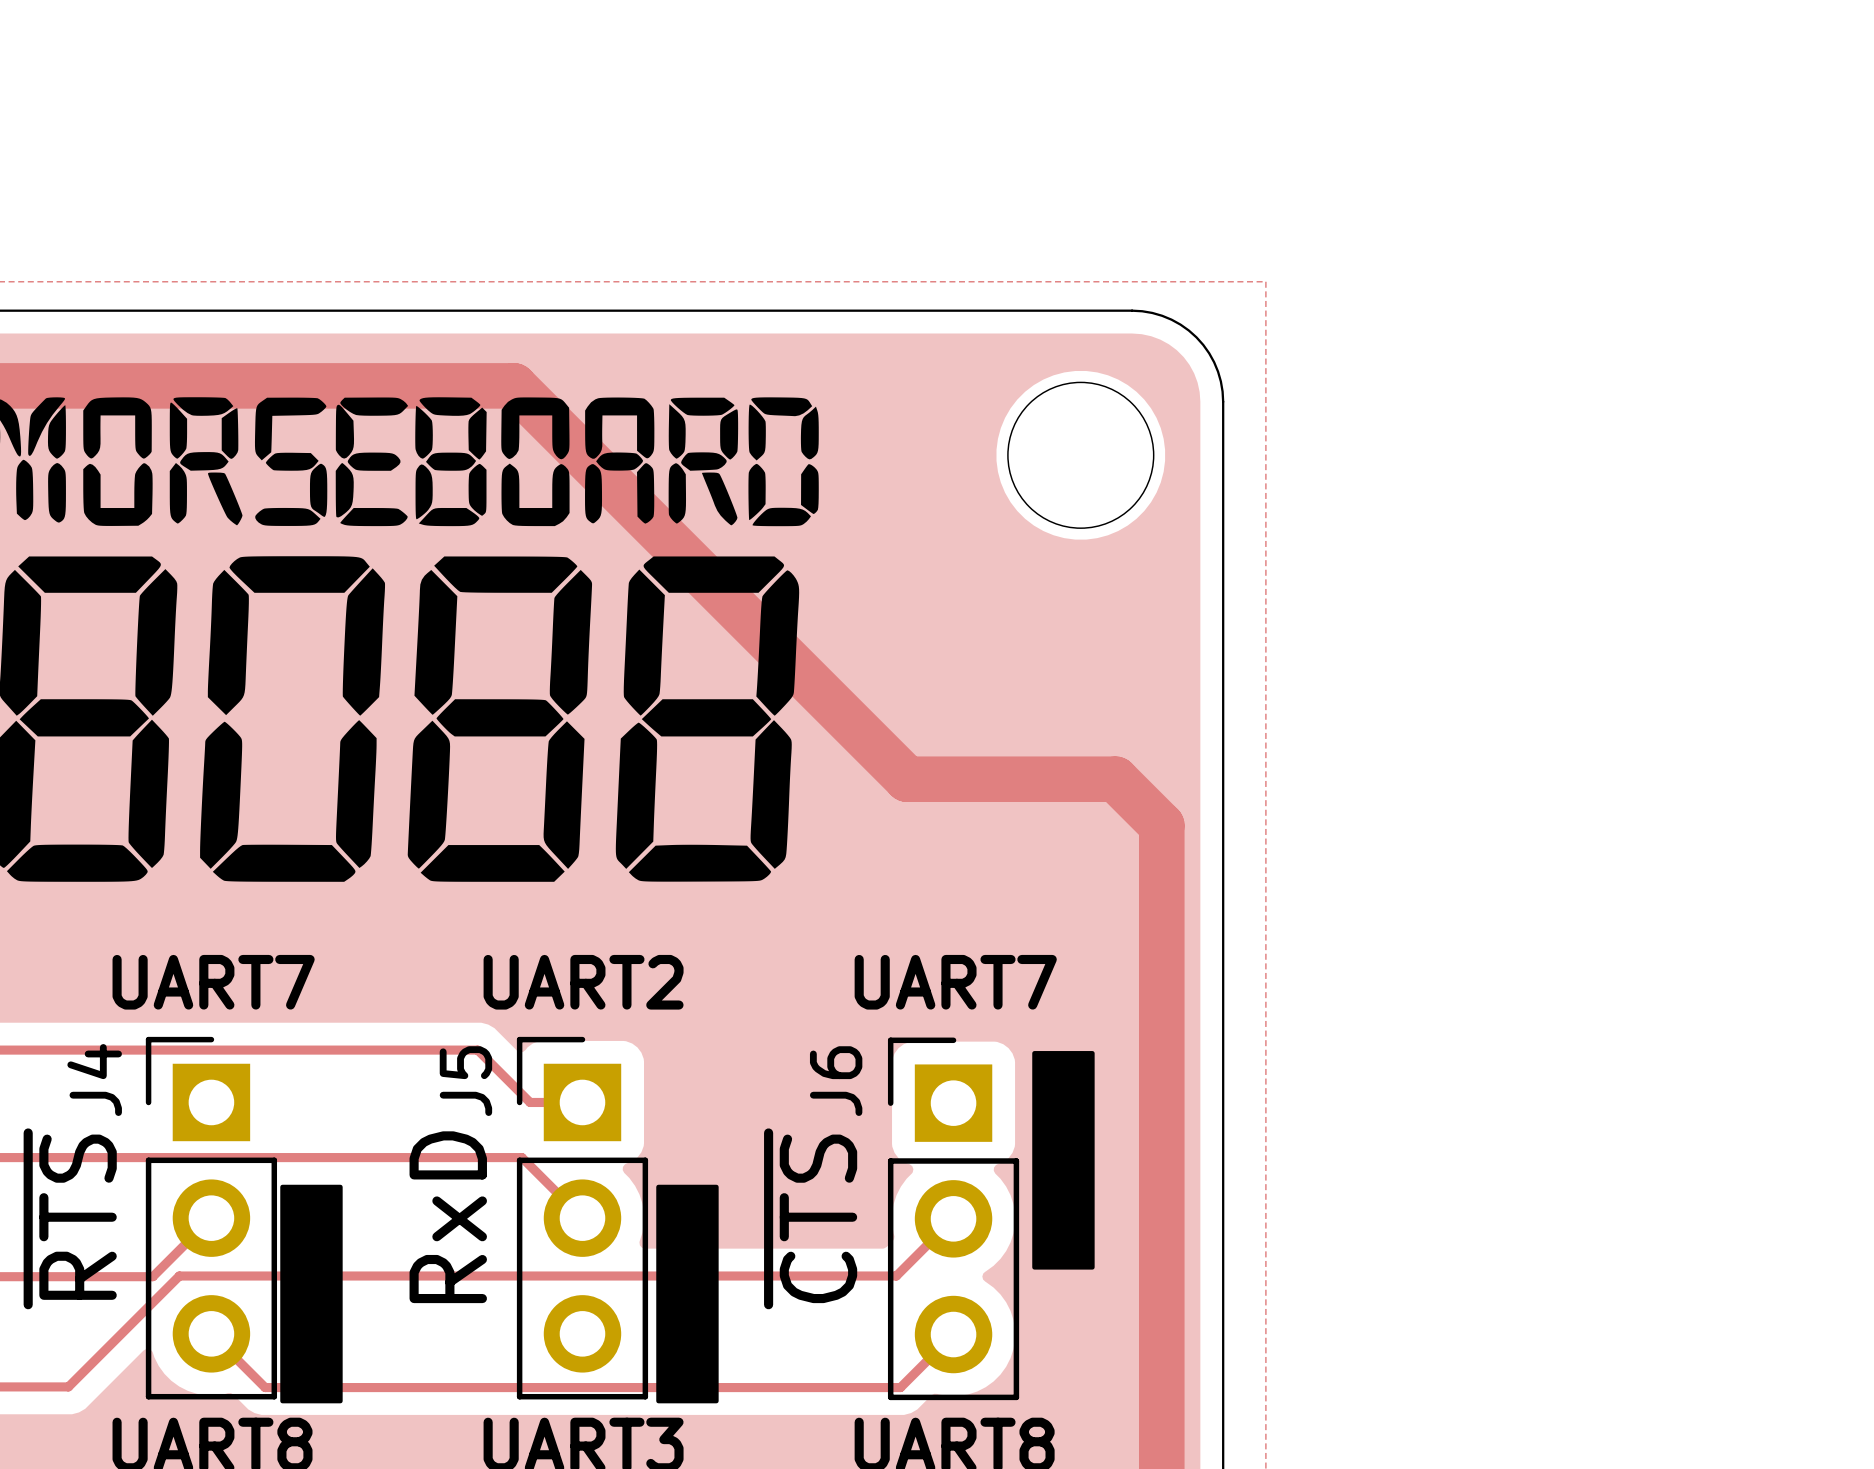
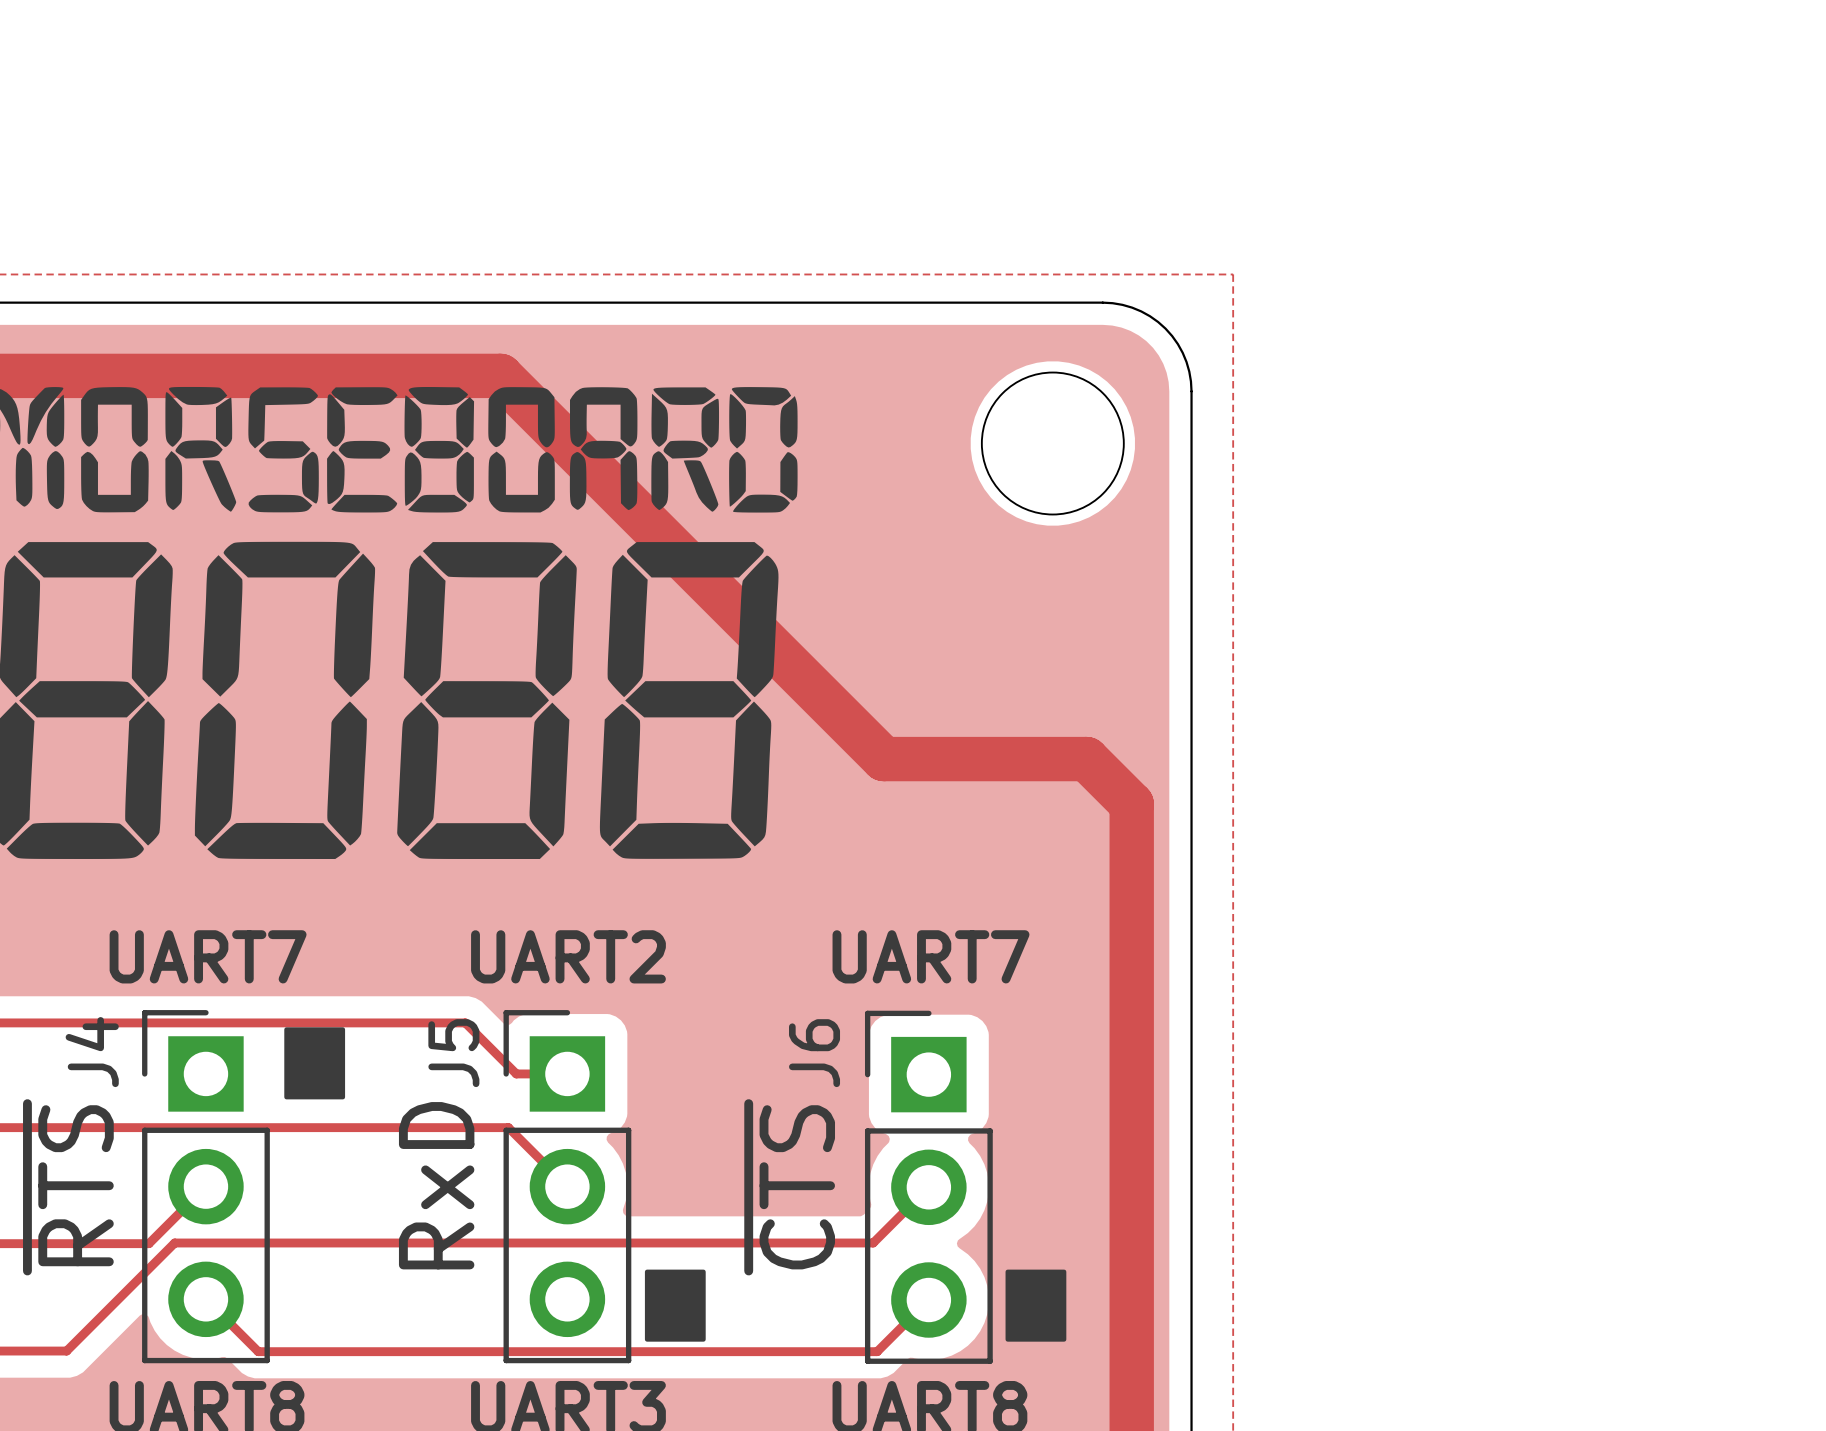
drawing: [1032, 1051, 1095, 1270] -> none
drawing: none -> [284, 1027, 346, 1100]
drawing: [280, 1184, 343, 1404] -> none
drawing: [656, 1184, 719, 1404] -> none
drawing: none -> [644, 1269, 706, 1342]
drawing: none -> [1005, 1269, 1067, 1342]

